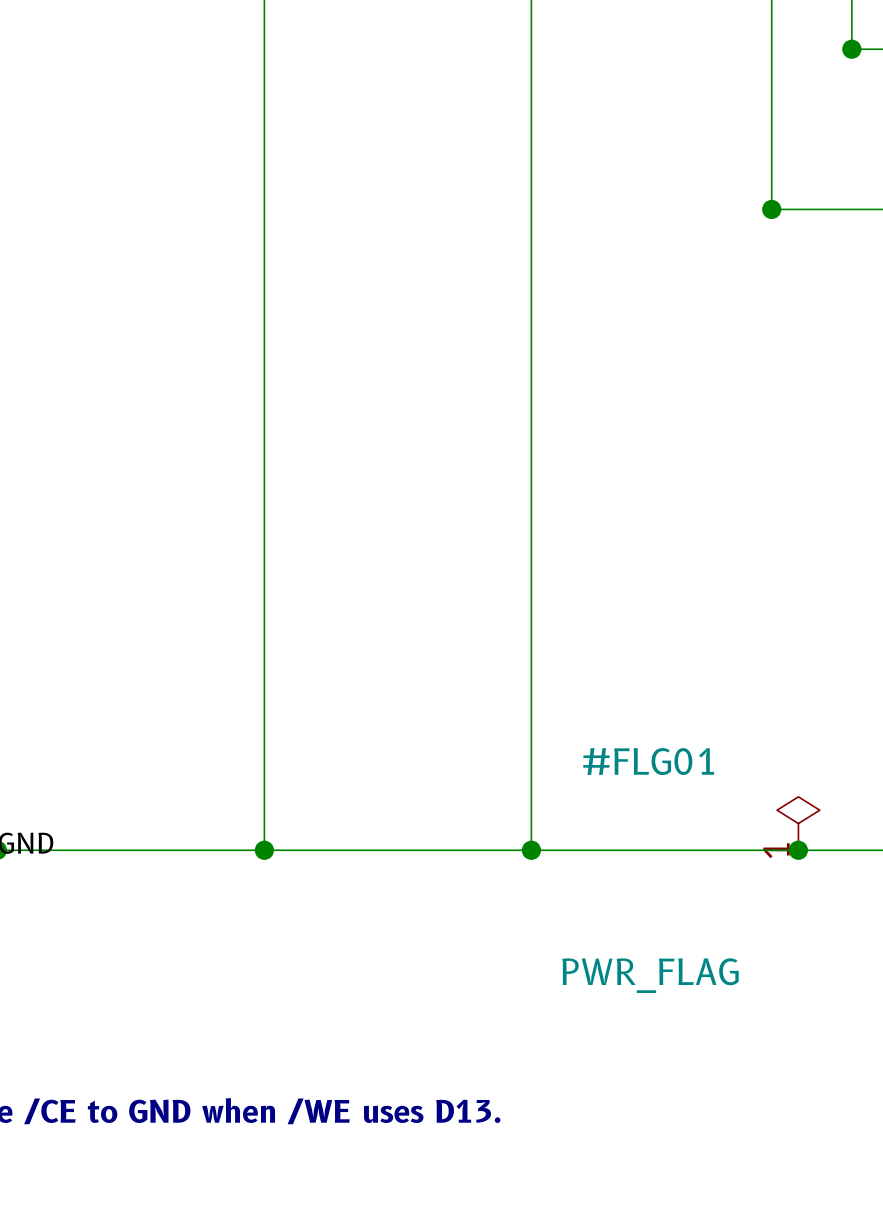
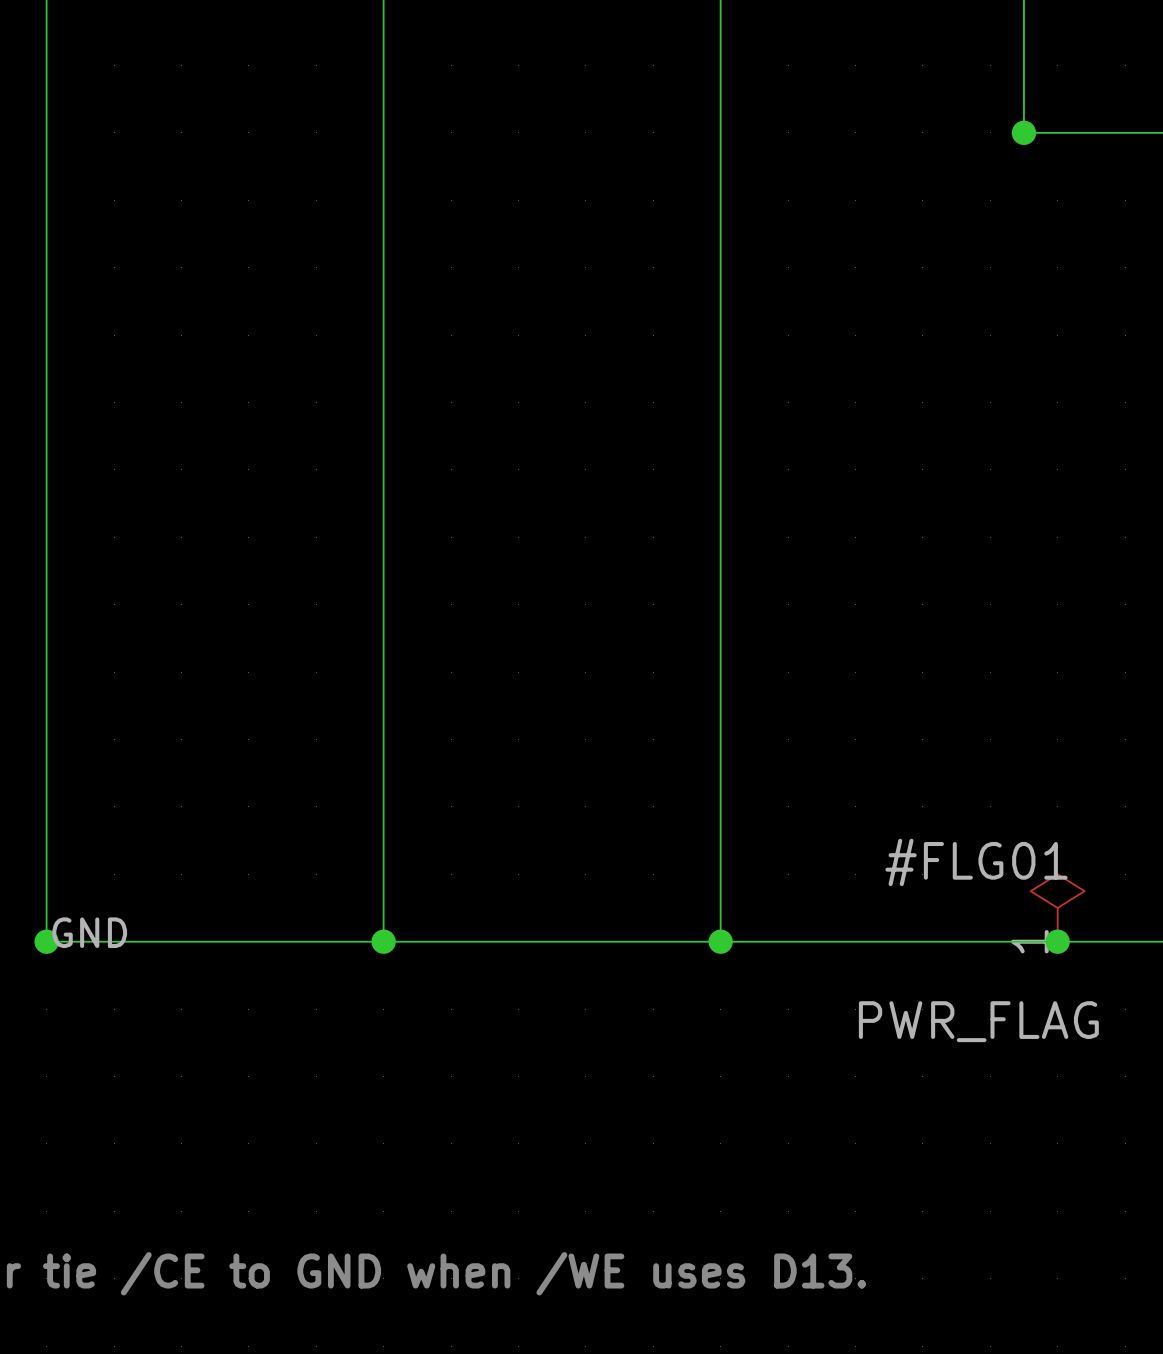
#FLG01 name position: #FLG01 (648, 761) -> #FLG01 (976, 862)
#FLG01 text position: PWR_FLAG (650, 975) -> PWR_FLAG (978, 1021)

